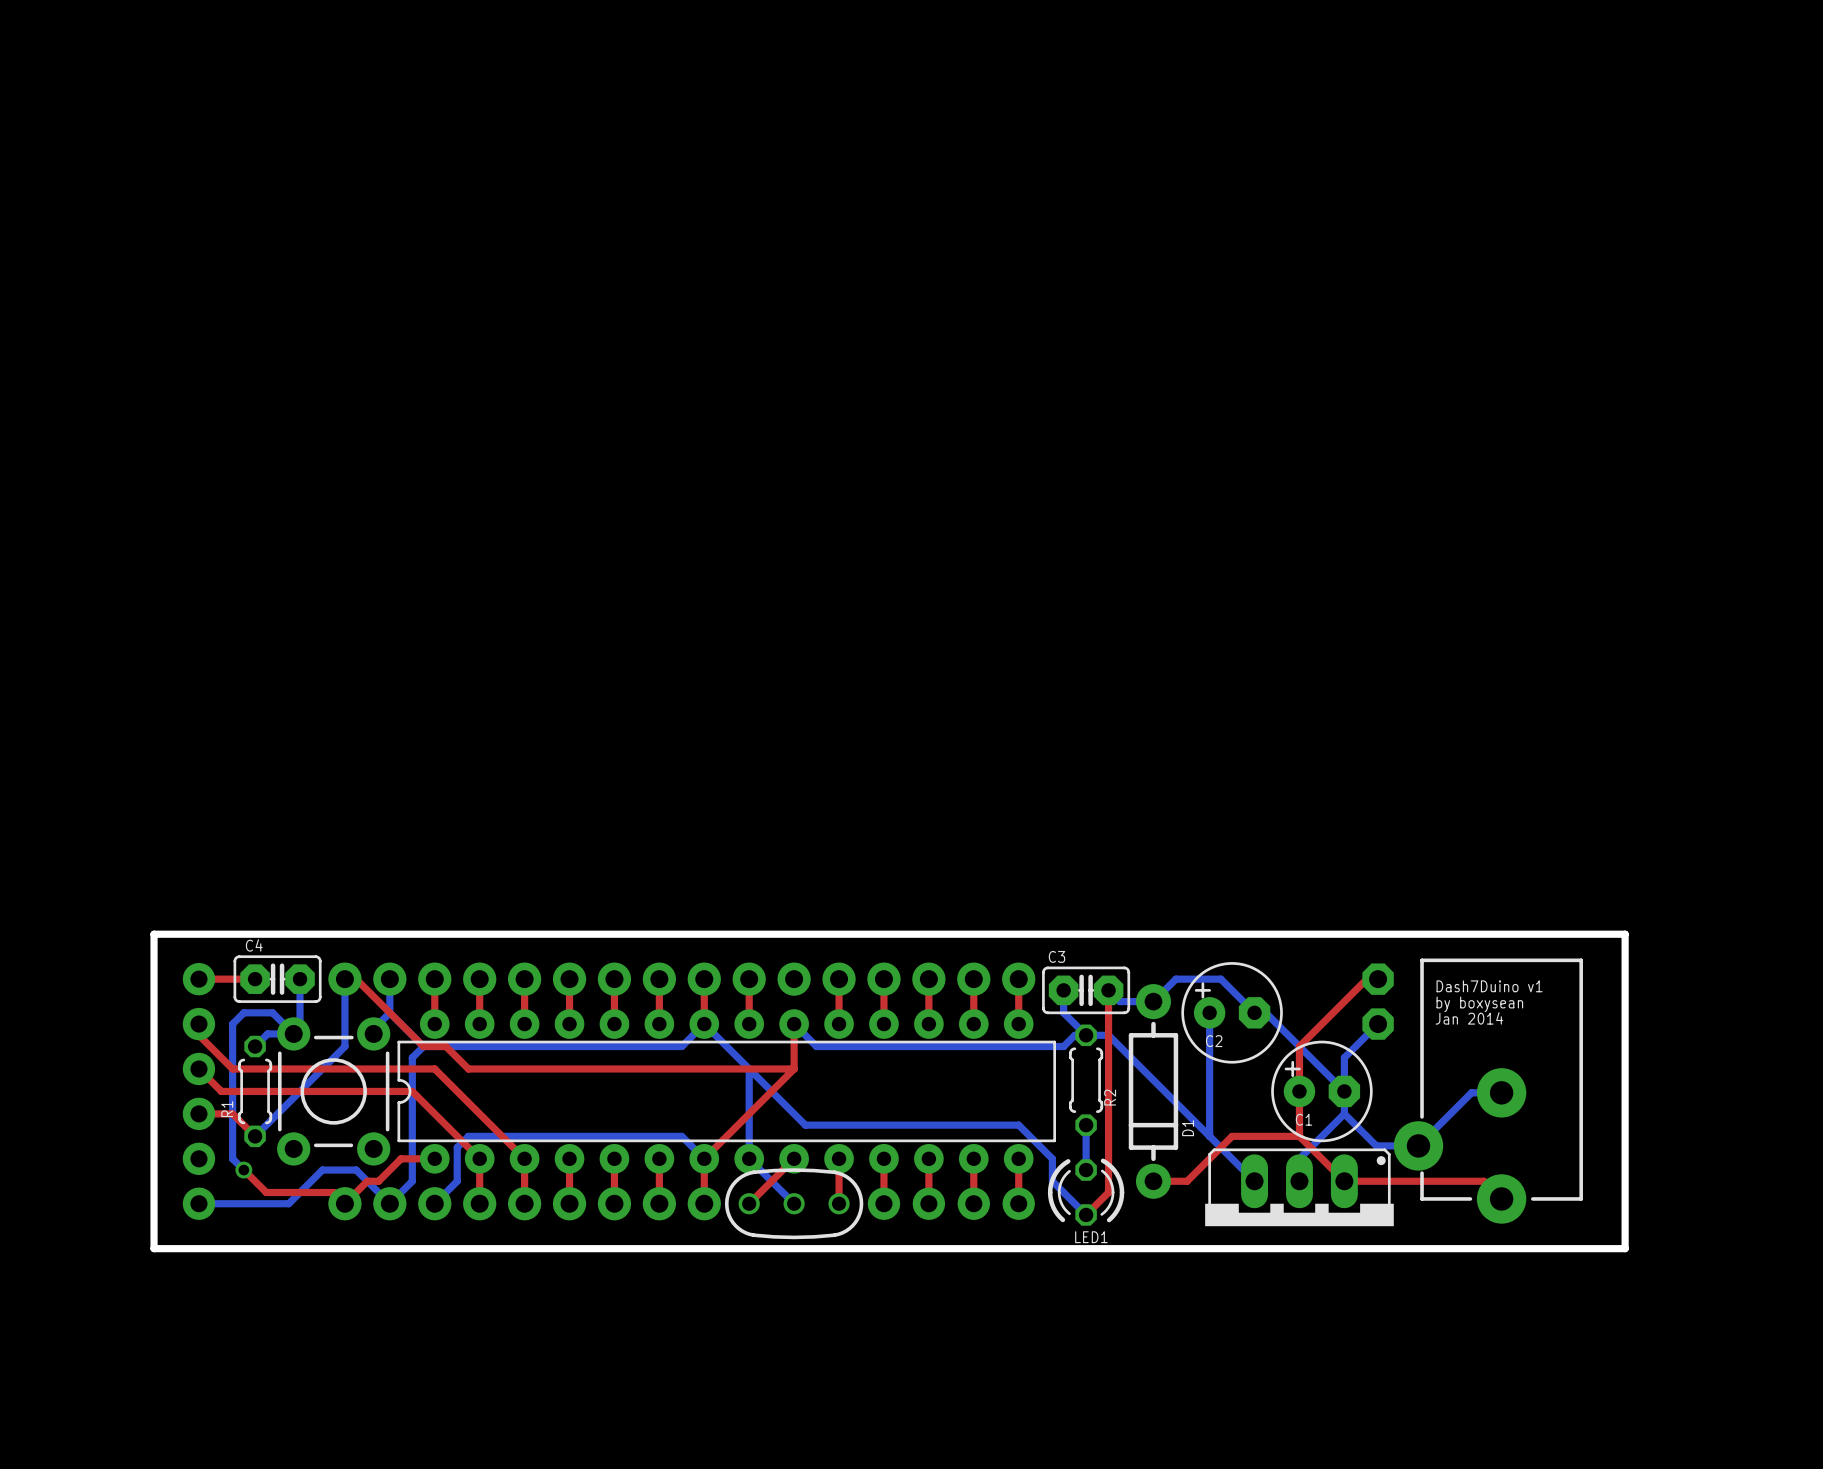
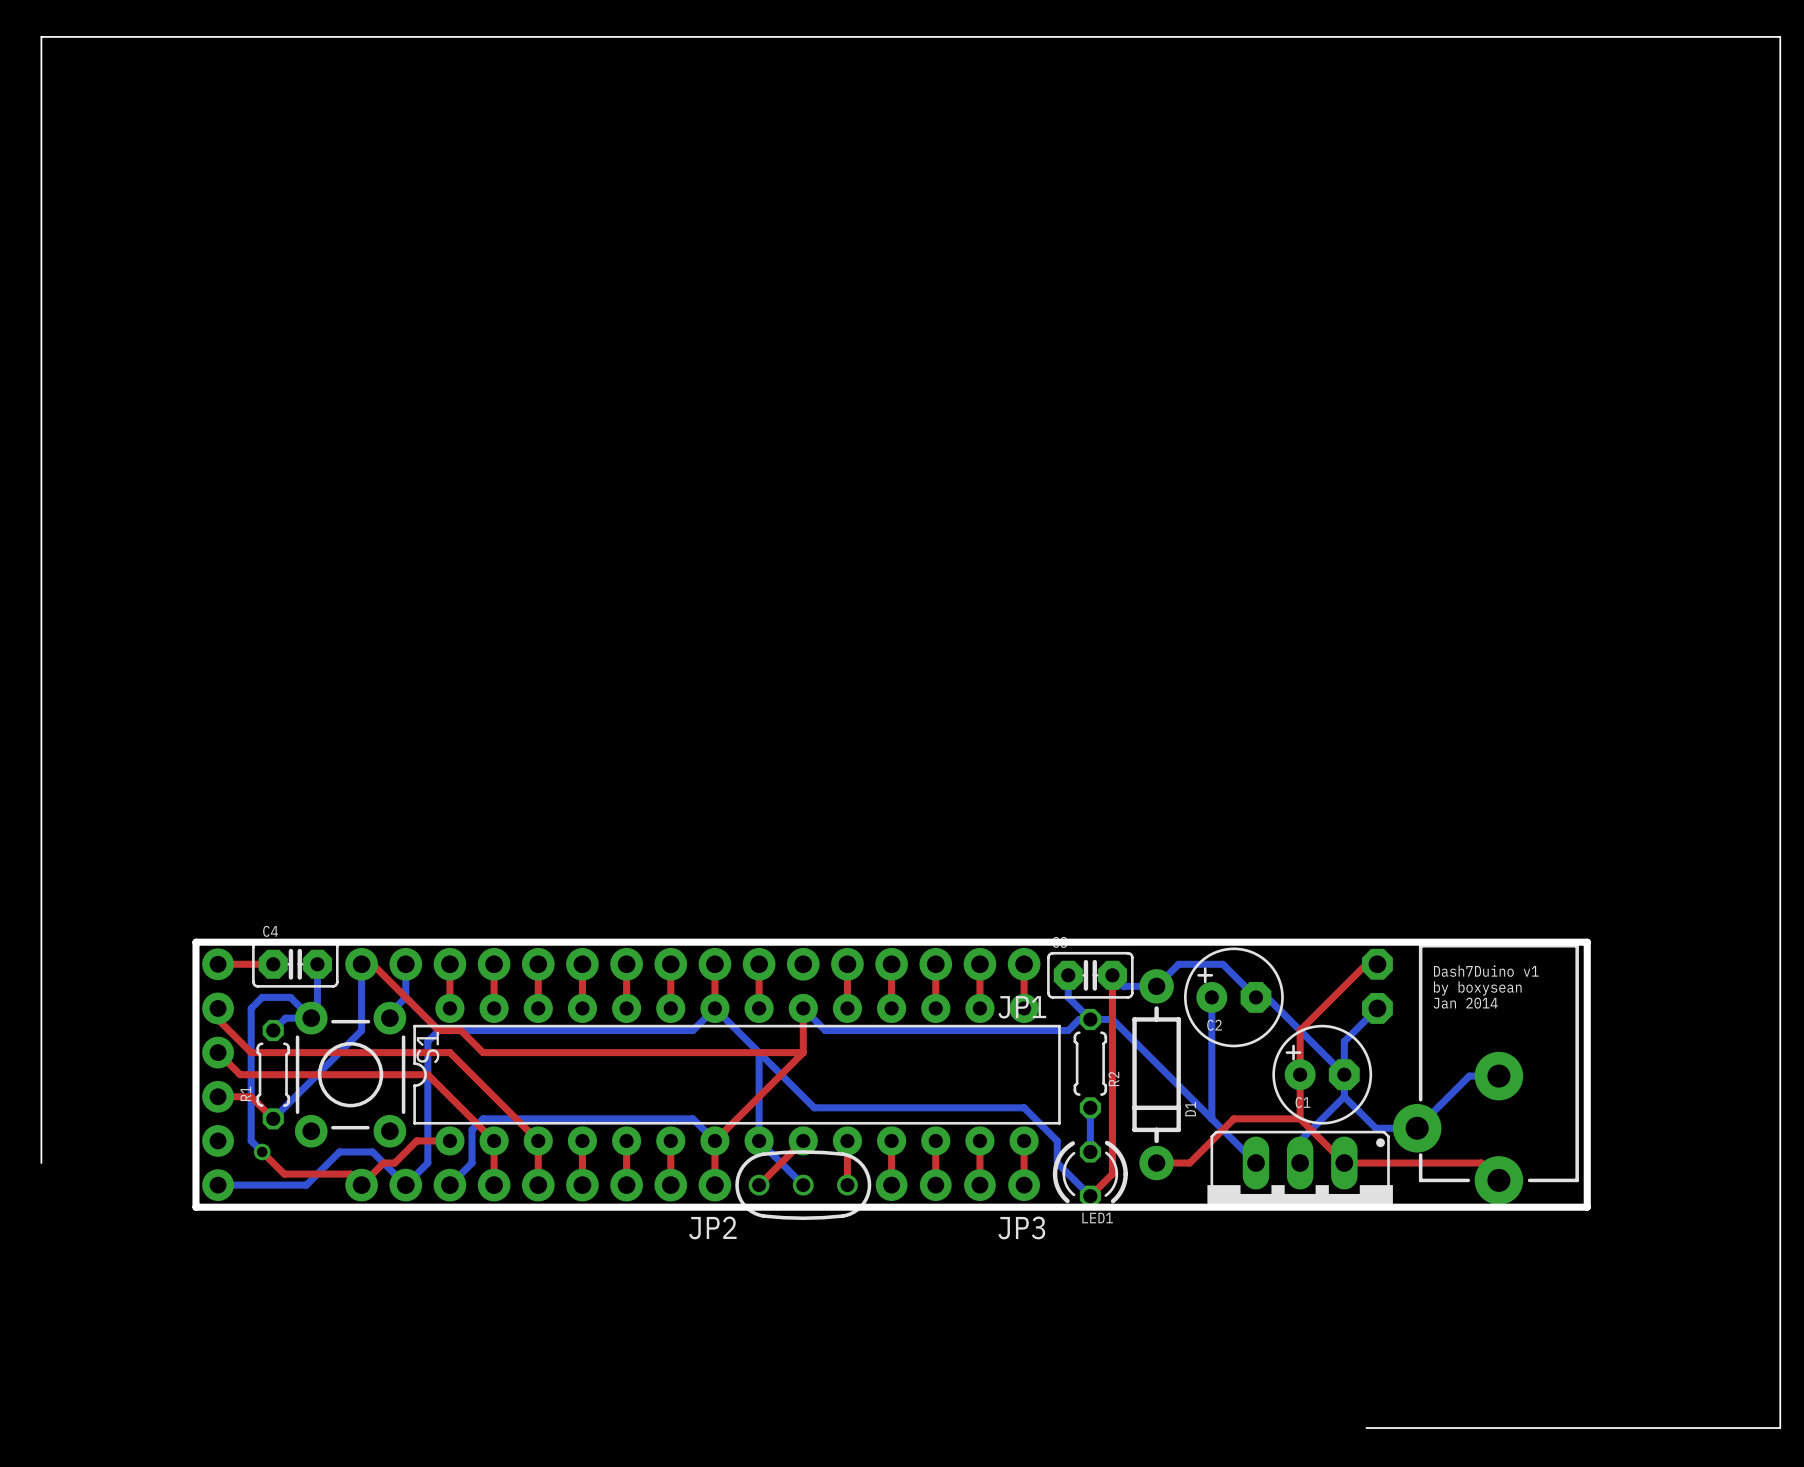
board edge: (154, 934) (154, 1248) (1625, 1248) (1625, 934) (154, 934) -> (195, 942) (195, 1207) (1587, 1207) (1587, 942) (195, 942)
JP1 name: none -> JP1 (1022, 1007)
S1 name: none -> S1 (427, 1047)
board edge: none -> (41, 1163) (41, 36) (1780, 36) (1780, 1428) (1366, 1428)
JP2 name: none -> JP2 (712, 1227)
JP3 name: none -> JP3 (1021, 1227)

